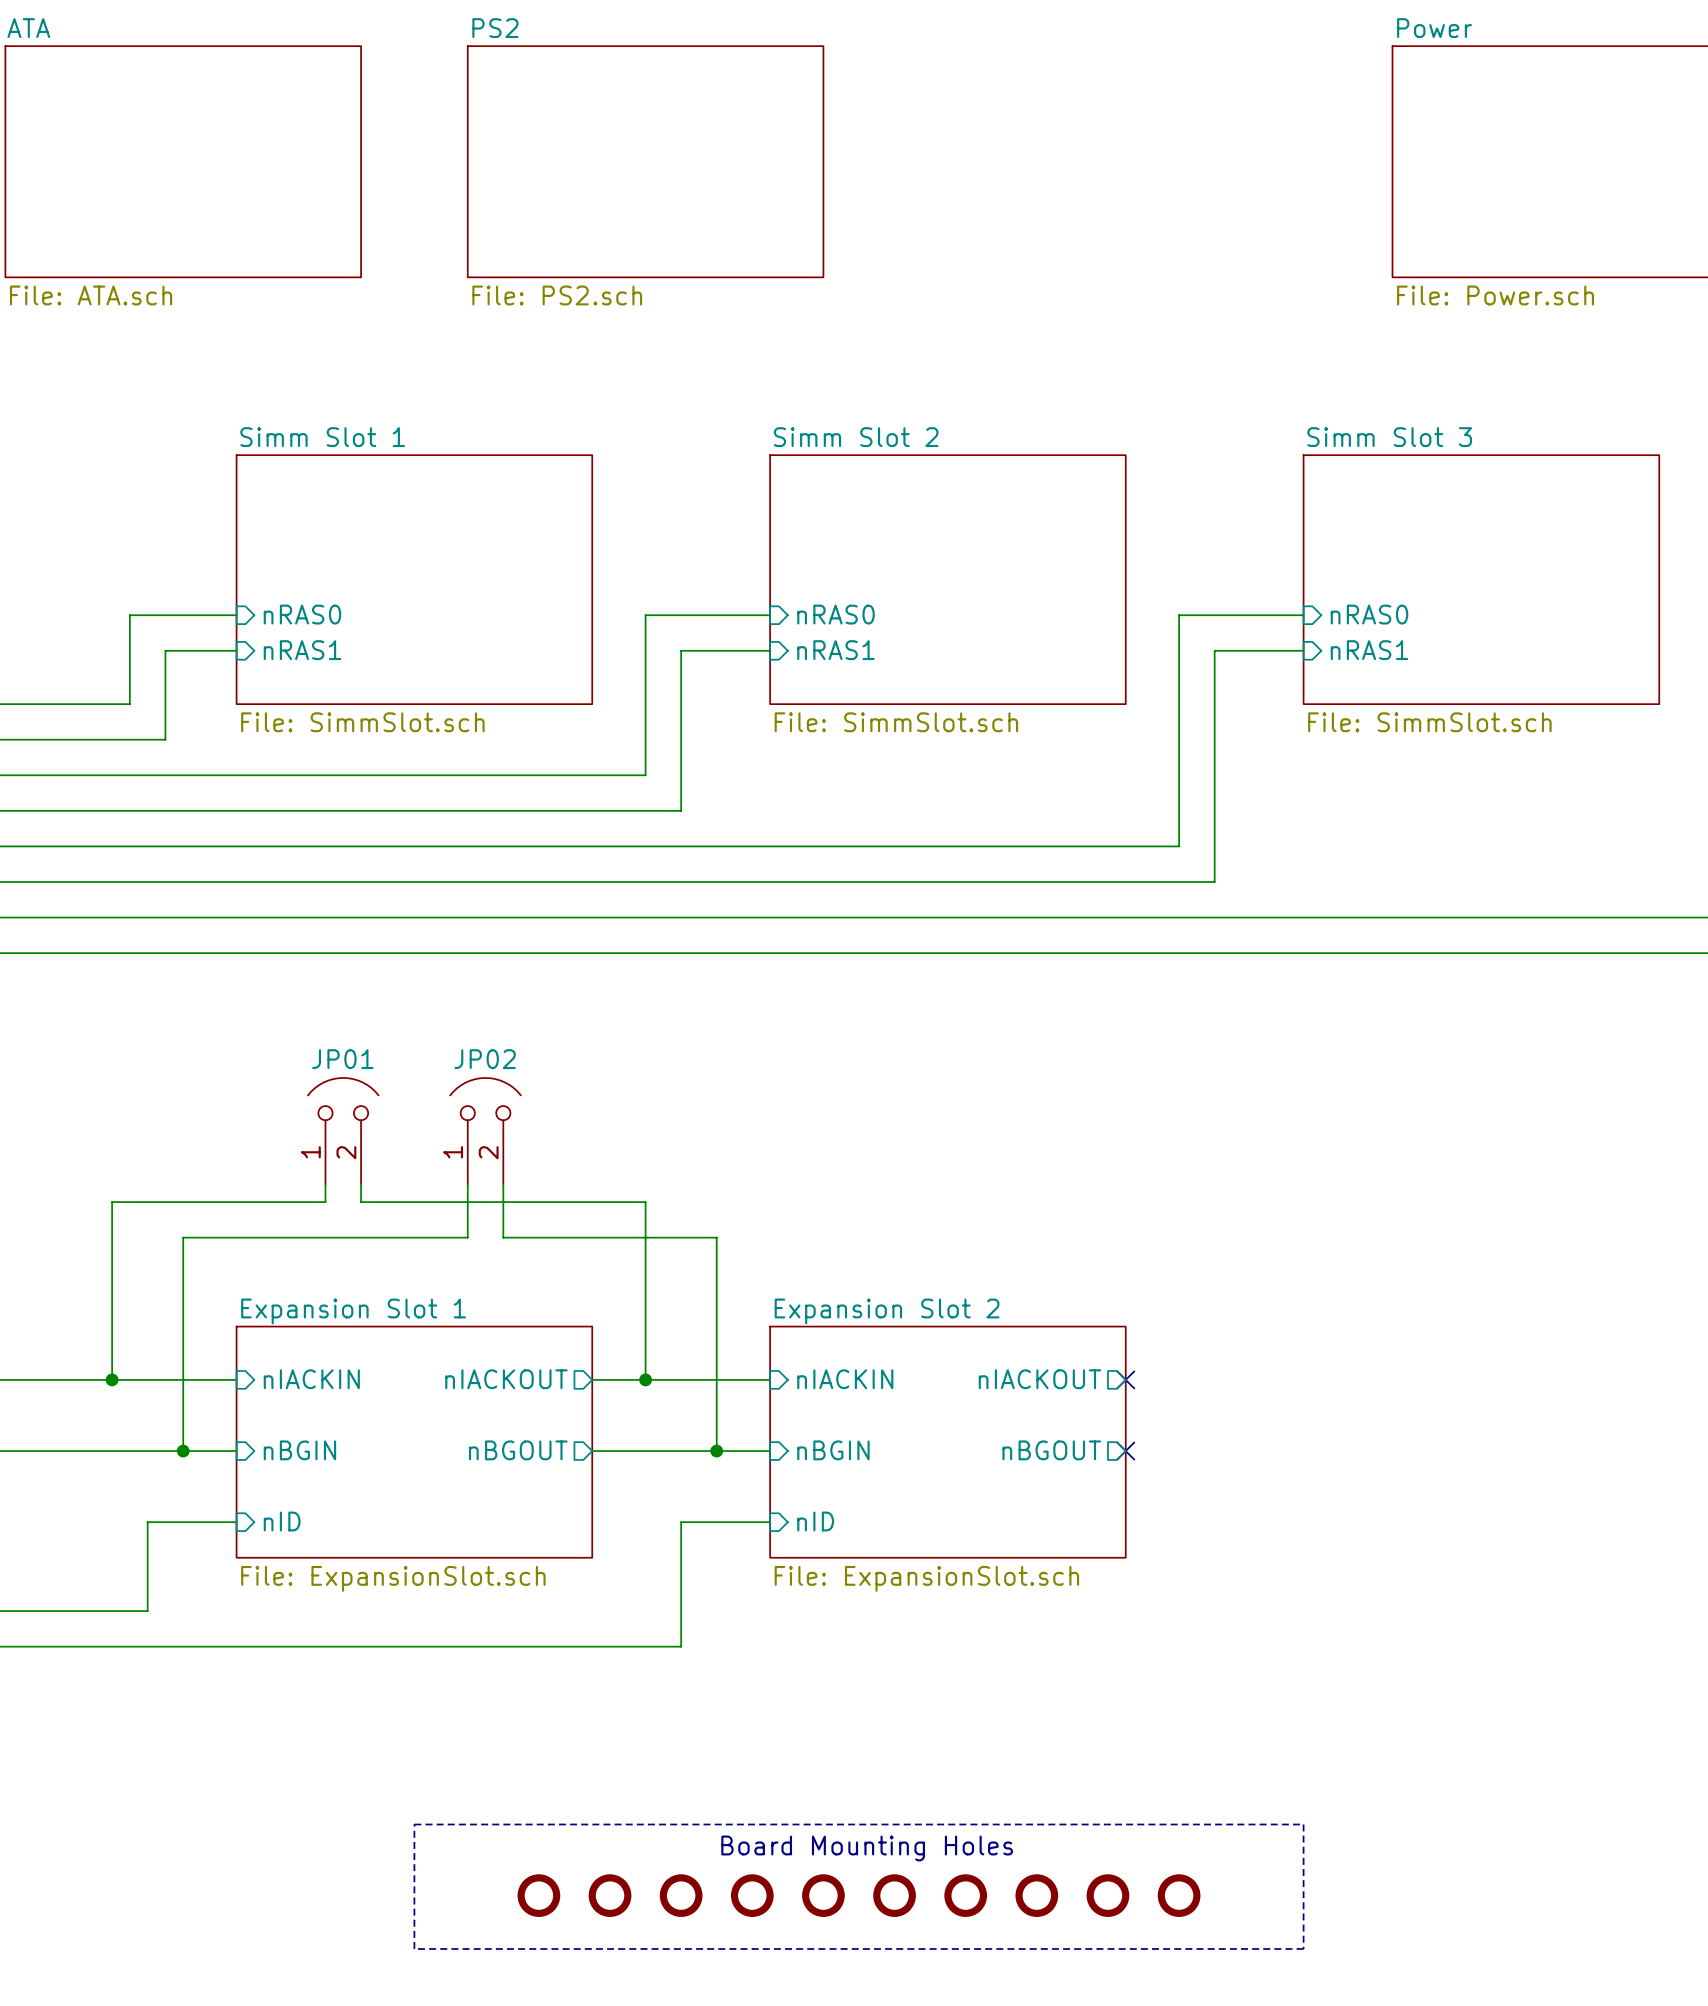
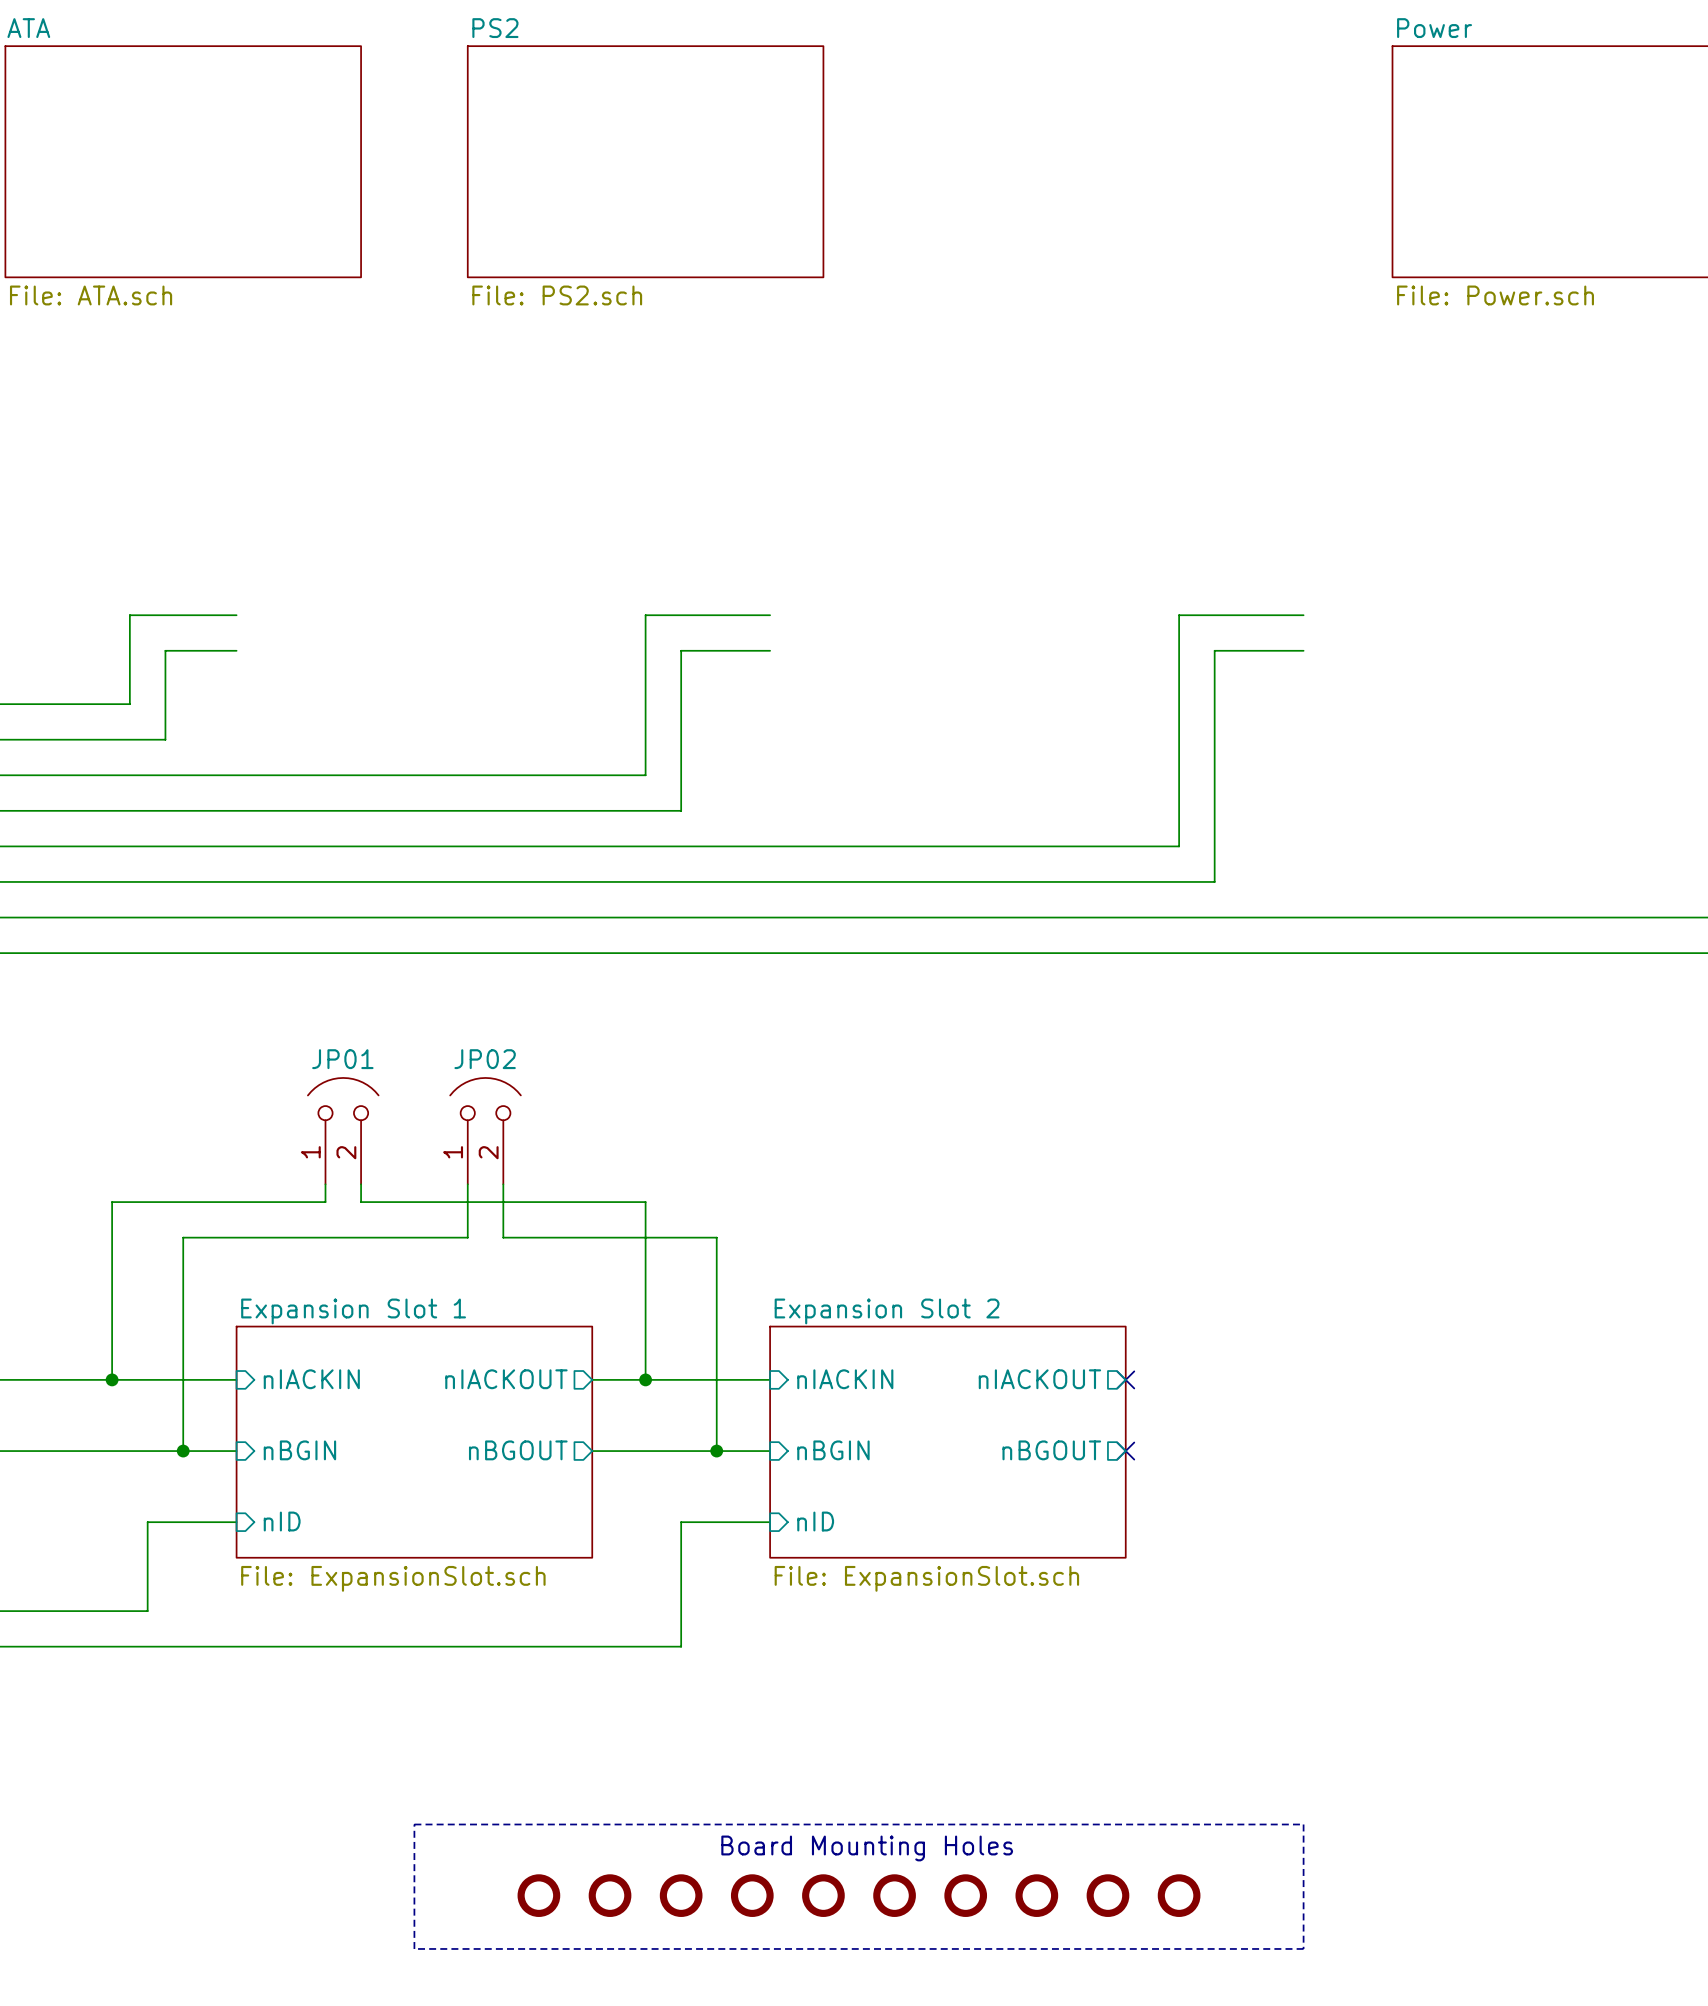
sheet Simm Slot 1: File: SimmSlot.sch (414, 579) -> none
sheet Simm Slot 2: File: SimmSlot.sch (947, 579) -> none
sheet Simm Slot 3: File: SimmSlot.sch (1481, 579) -> none
sheet pin: nRAS0 (302, 614) -> none
sheet pin: nRAS0 (835, 614) -> none
sheet pin: nRAS0 (1369, 614) -> none
sheet pin: nRAS1 (302, 650) -> none
sheet pin: nRAS1 (835, 650) -> none
sheet pin: nRAS1 (1369, 650) -> none

